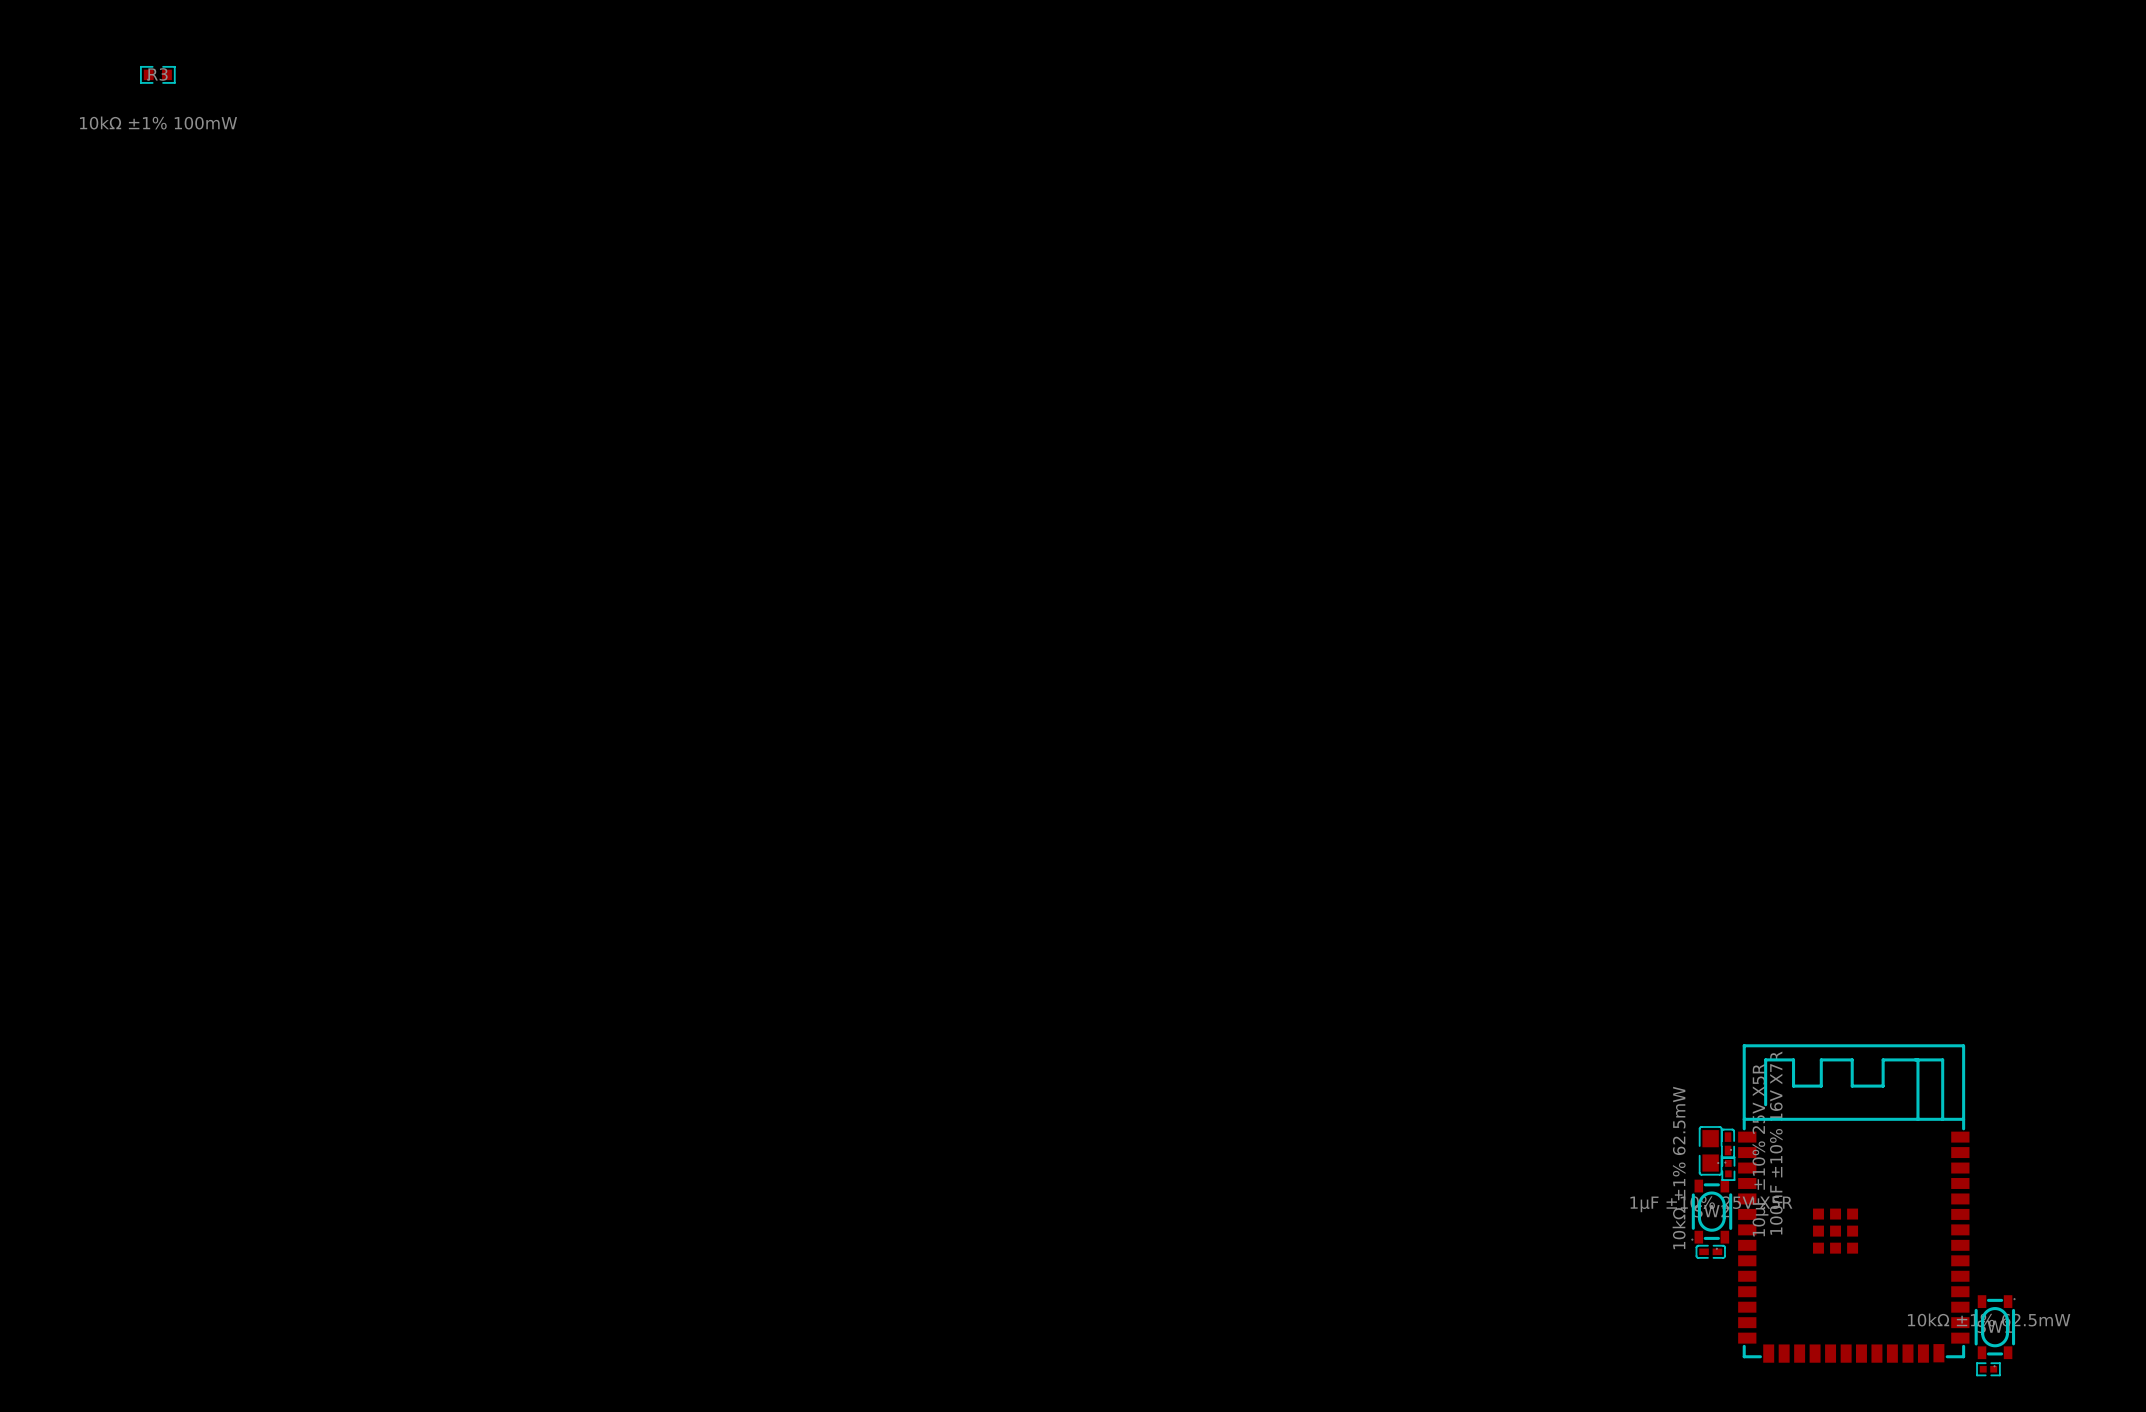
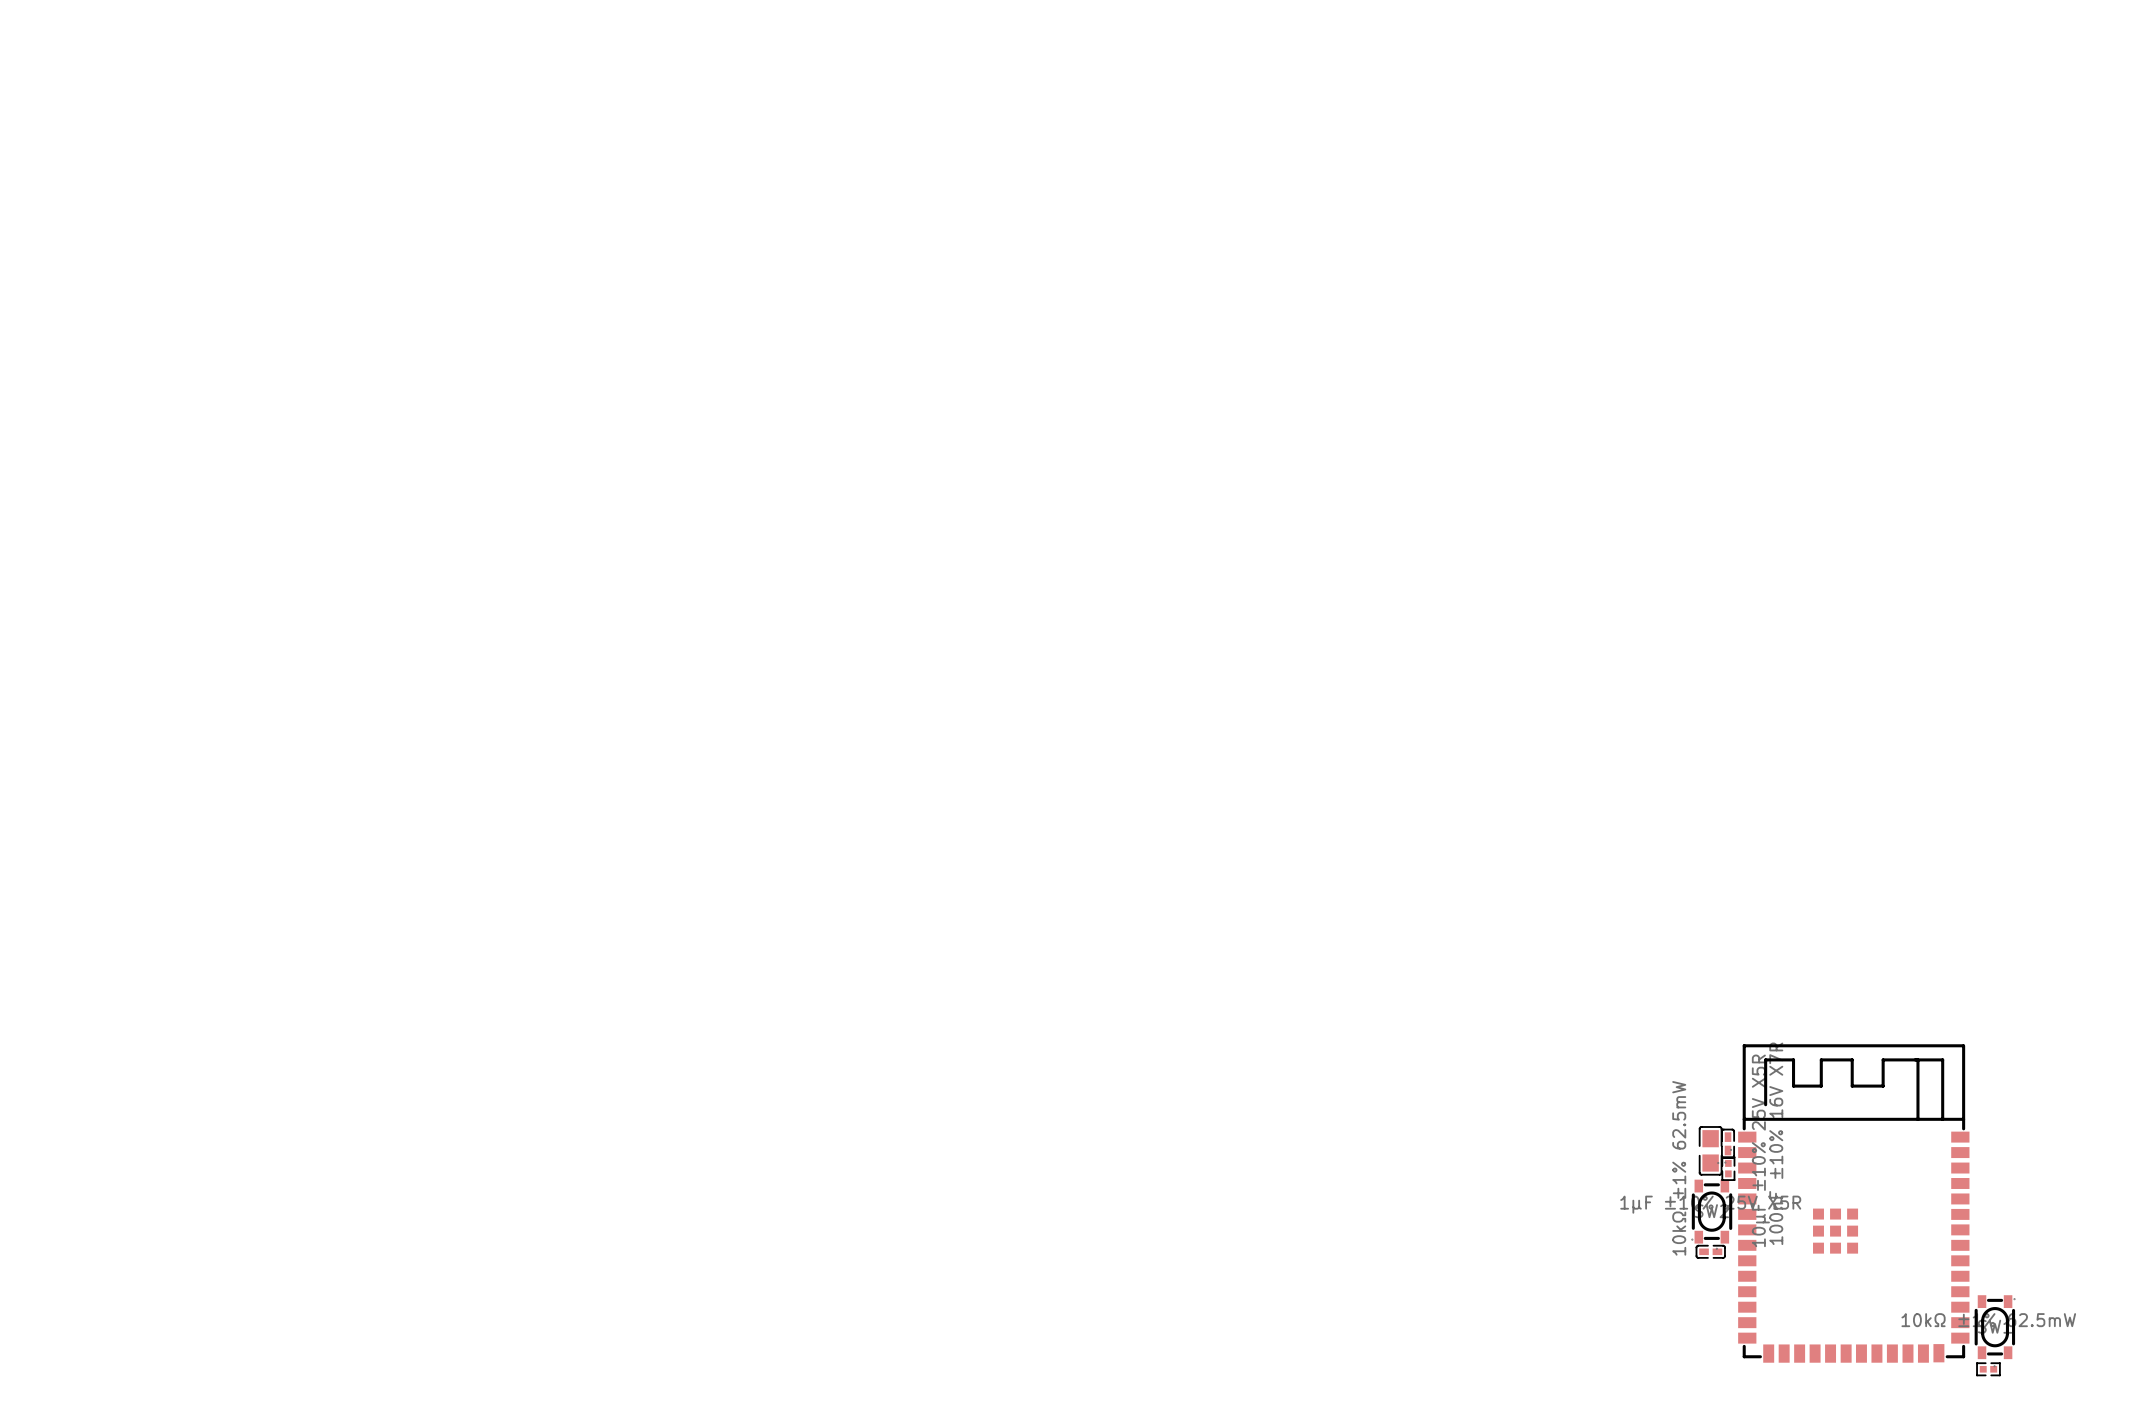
R3: 10kΩ ±1% 100mW (157, 74) -> none

